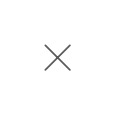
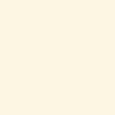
no-connect mark: (57, 57) -> none

